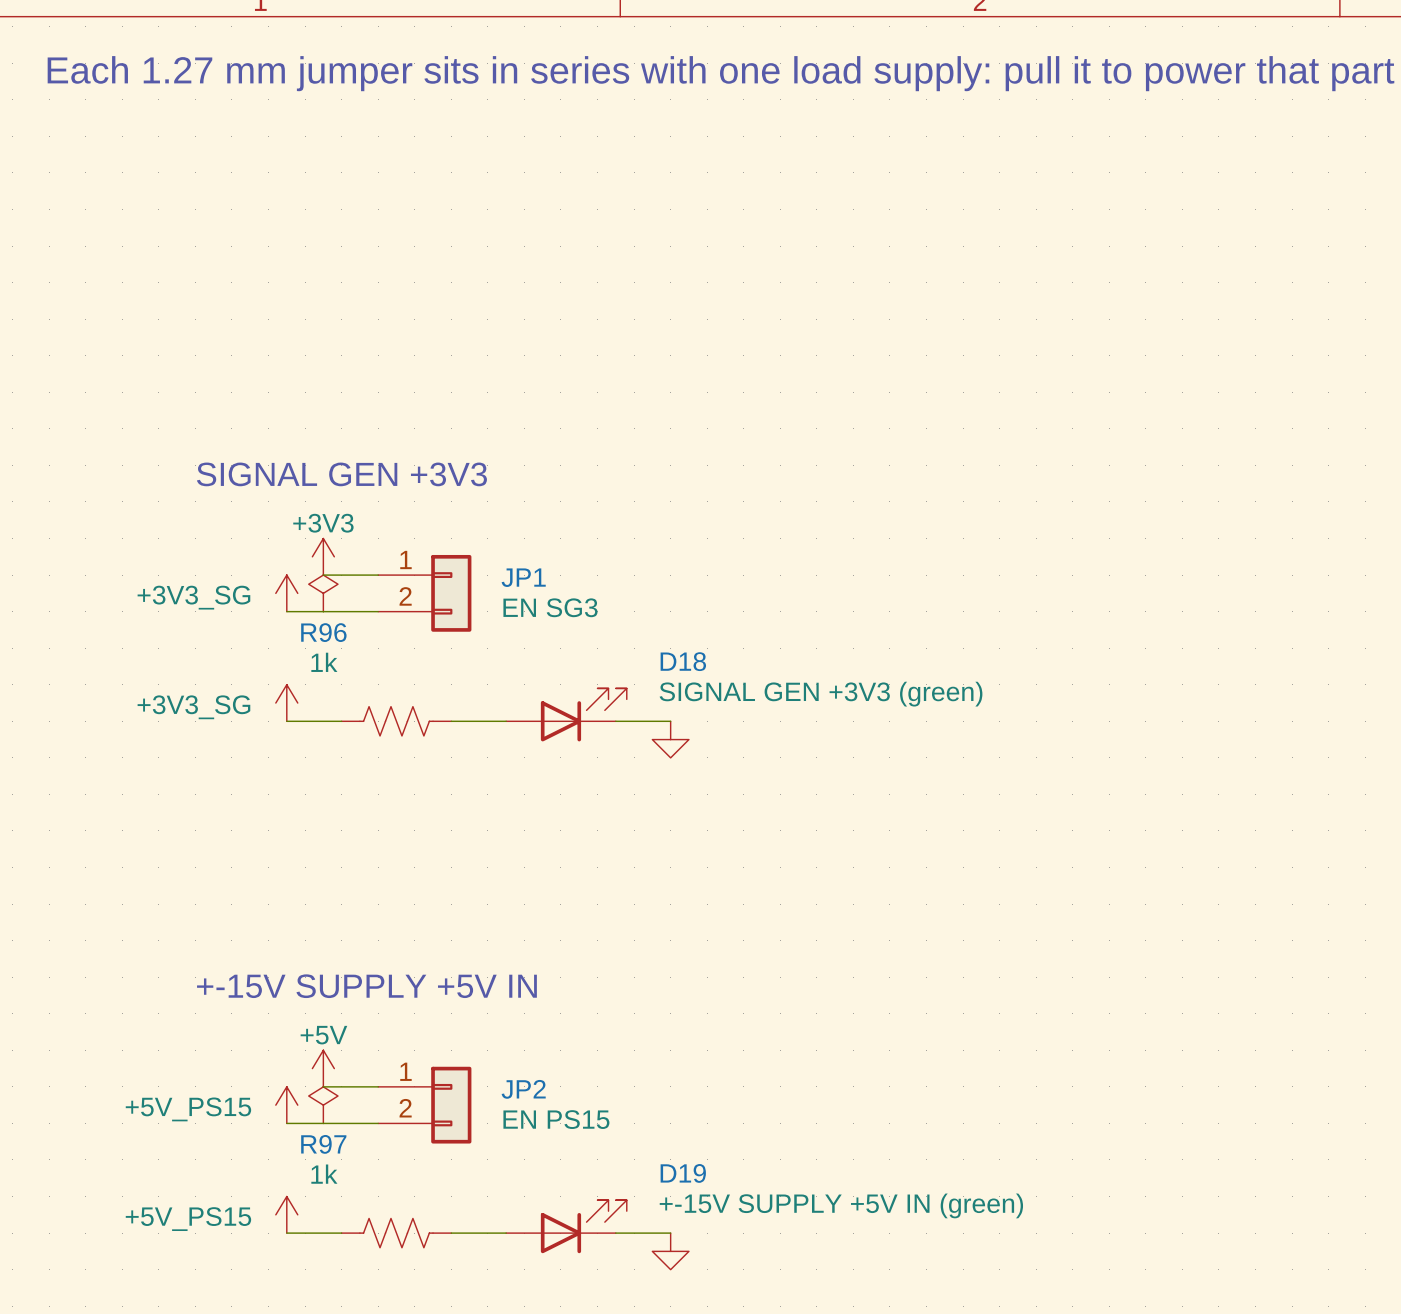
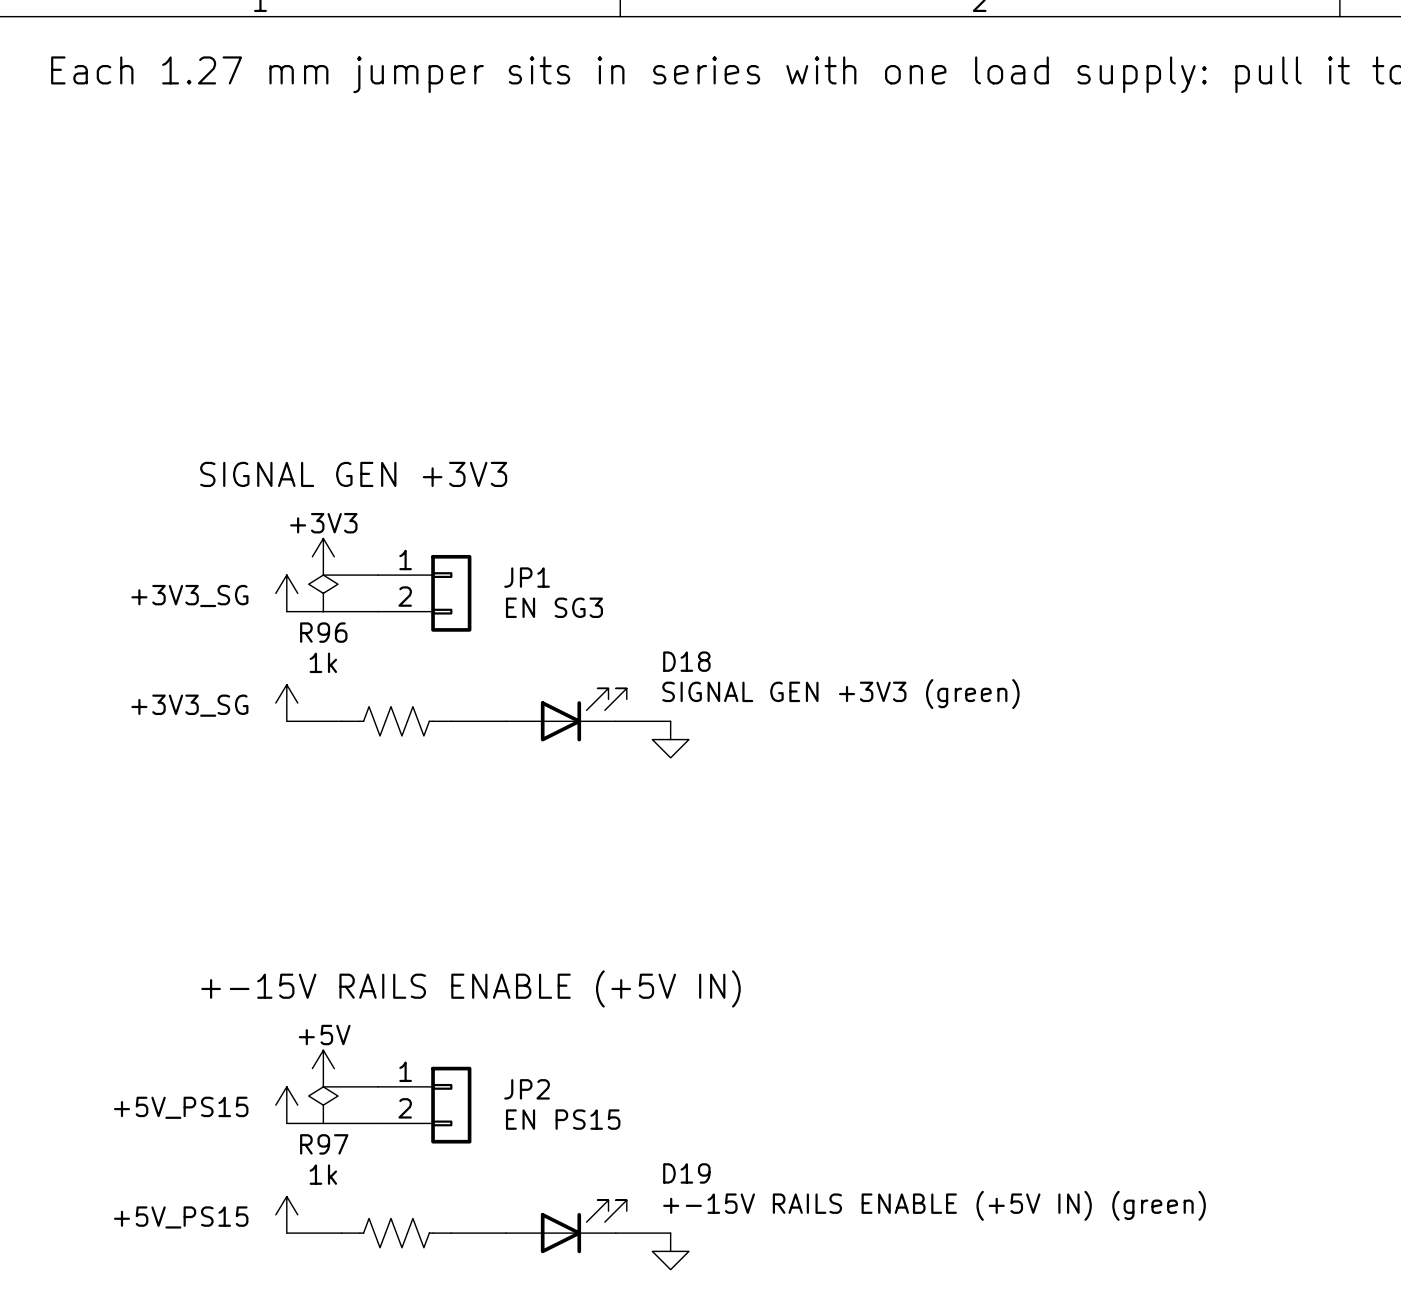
text: +-15V SUPPLY +5V IN (366, 986) -> +-15V RAILS ENABLE (+5V IN) (470, 988)
D19 value: +-15V SUPPLY +5V IN (green) (841, 1205) -> +-15V RAILS ENABLE (+5V IN) (green) (934, 1205)

